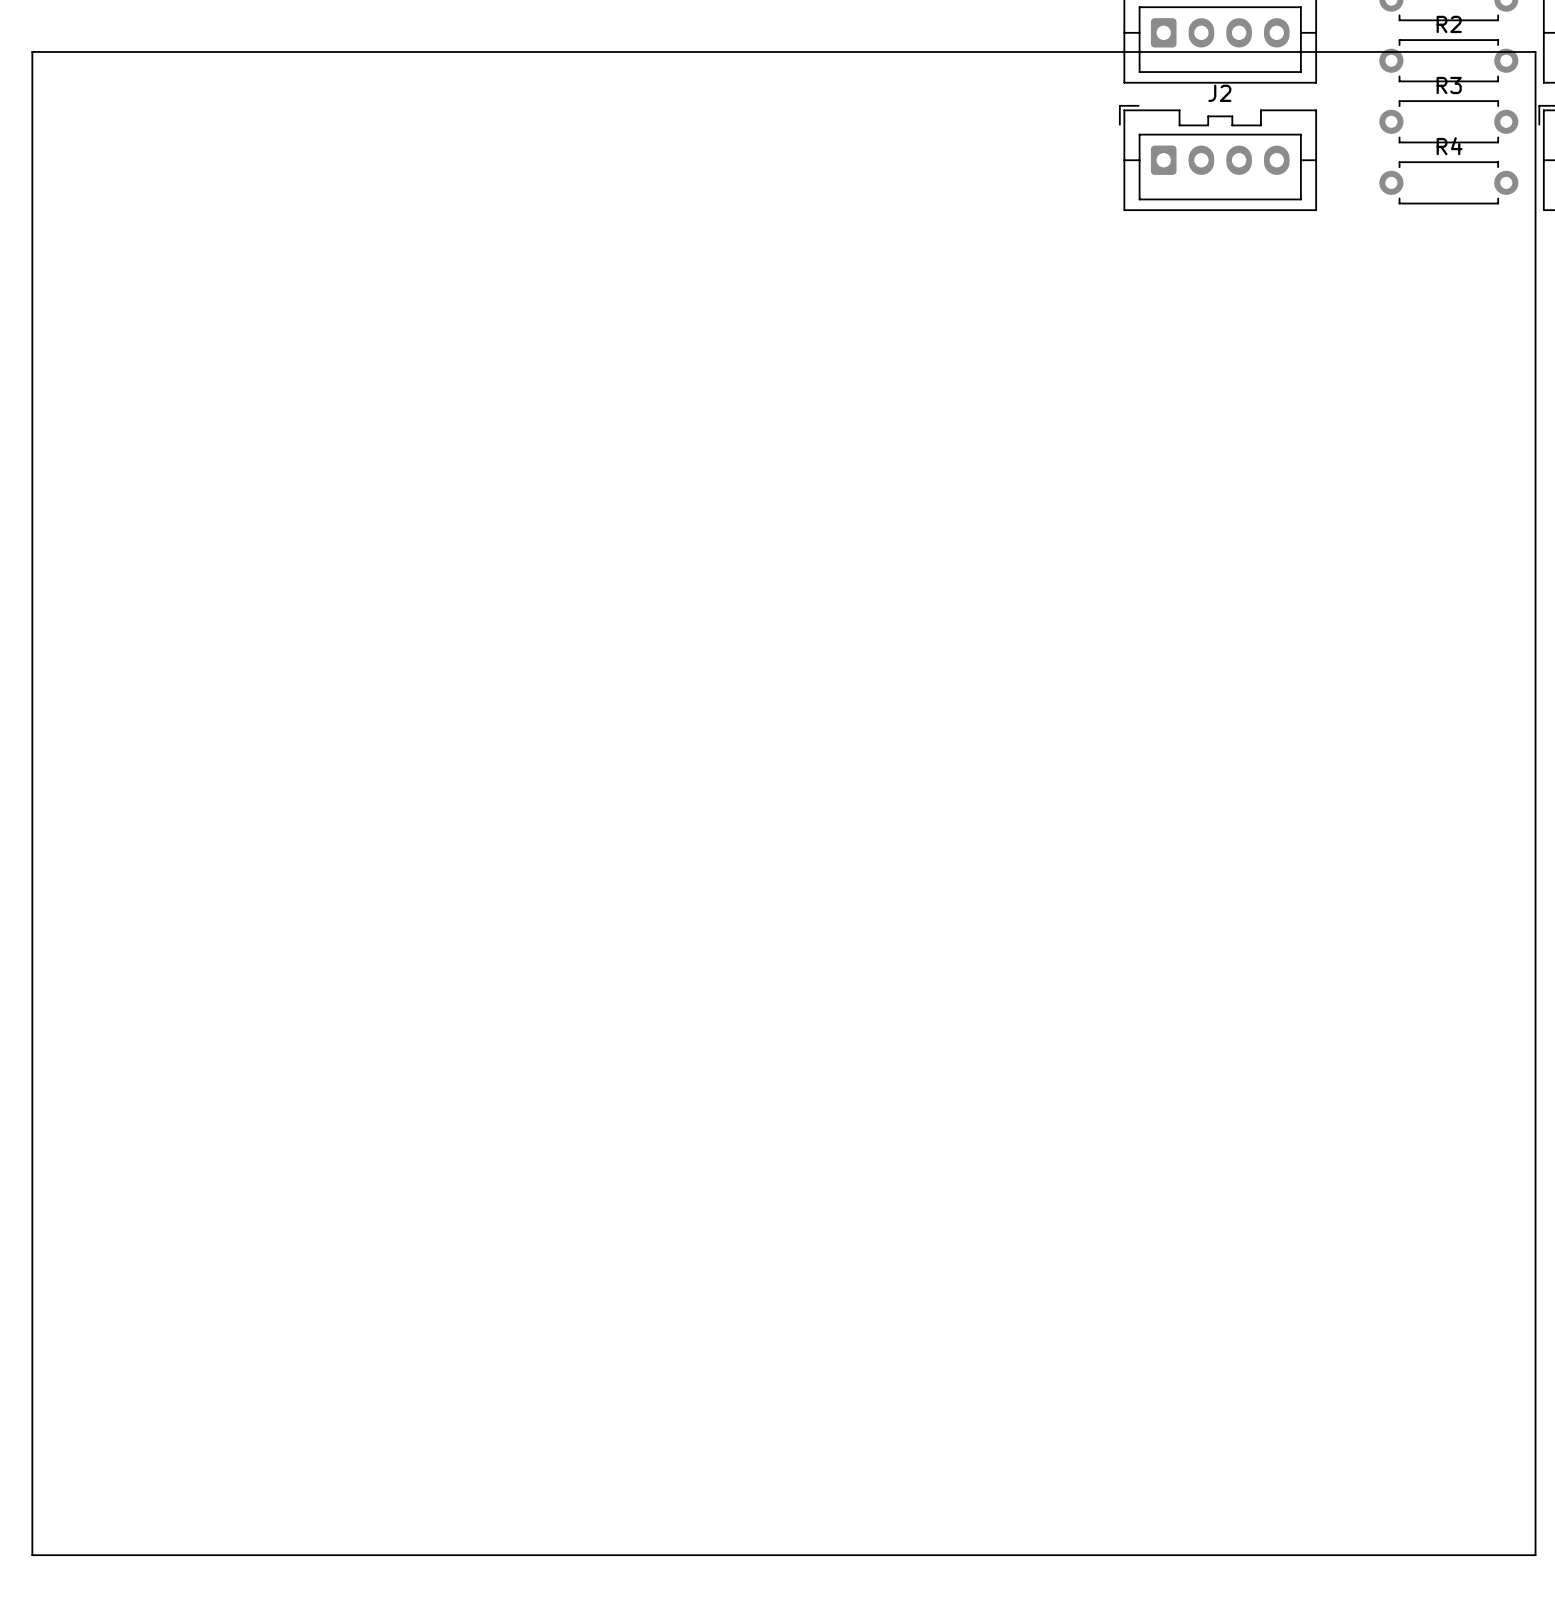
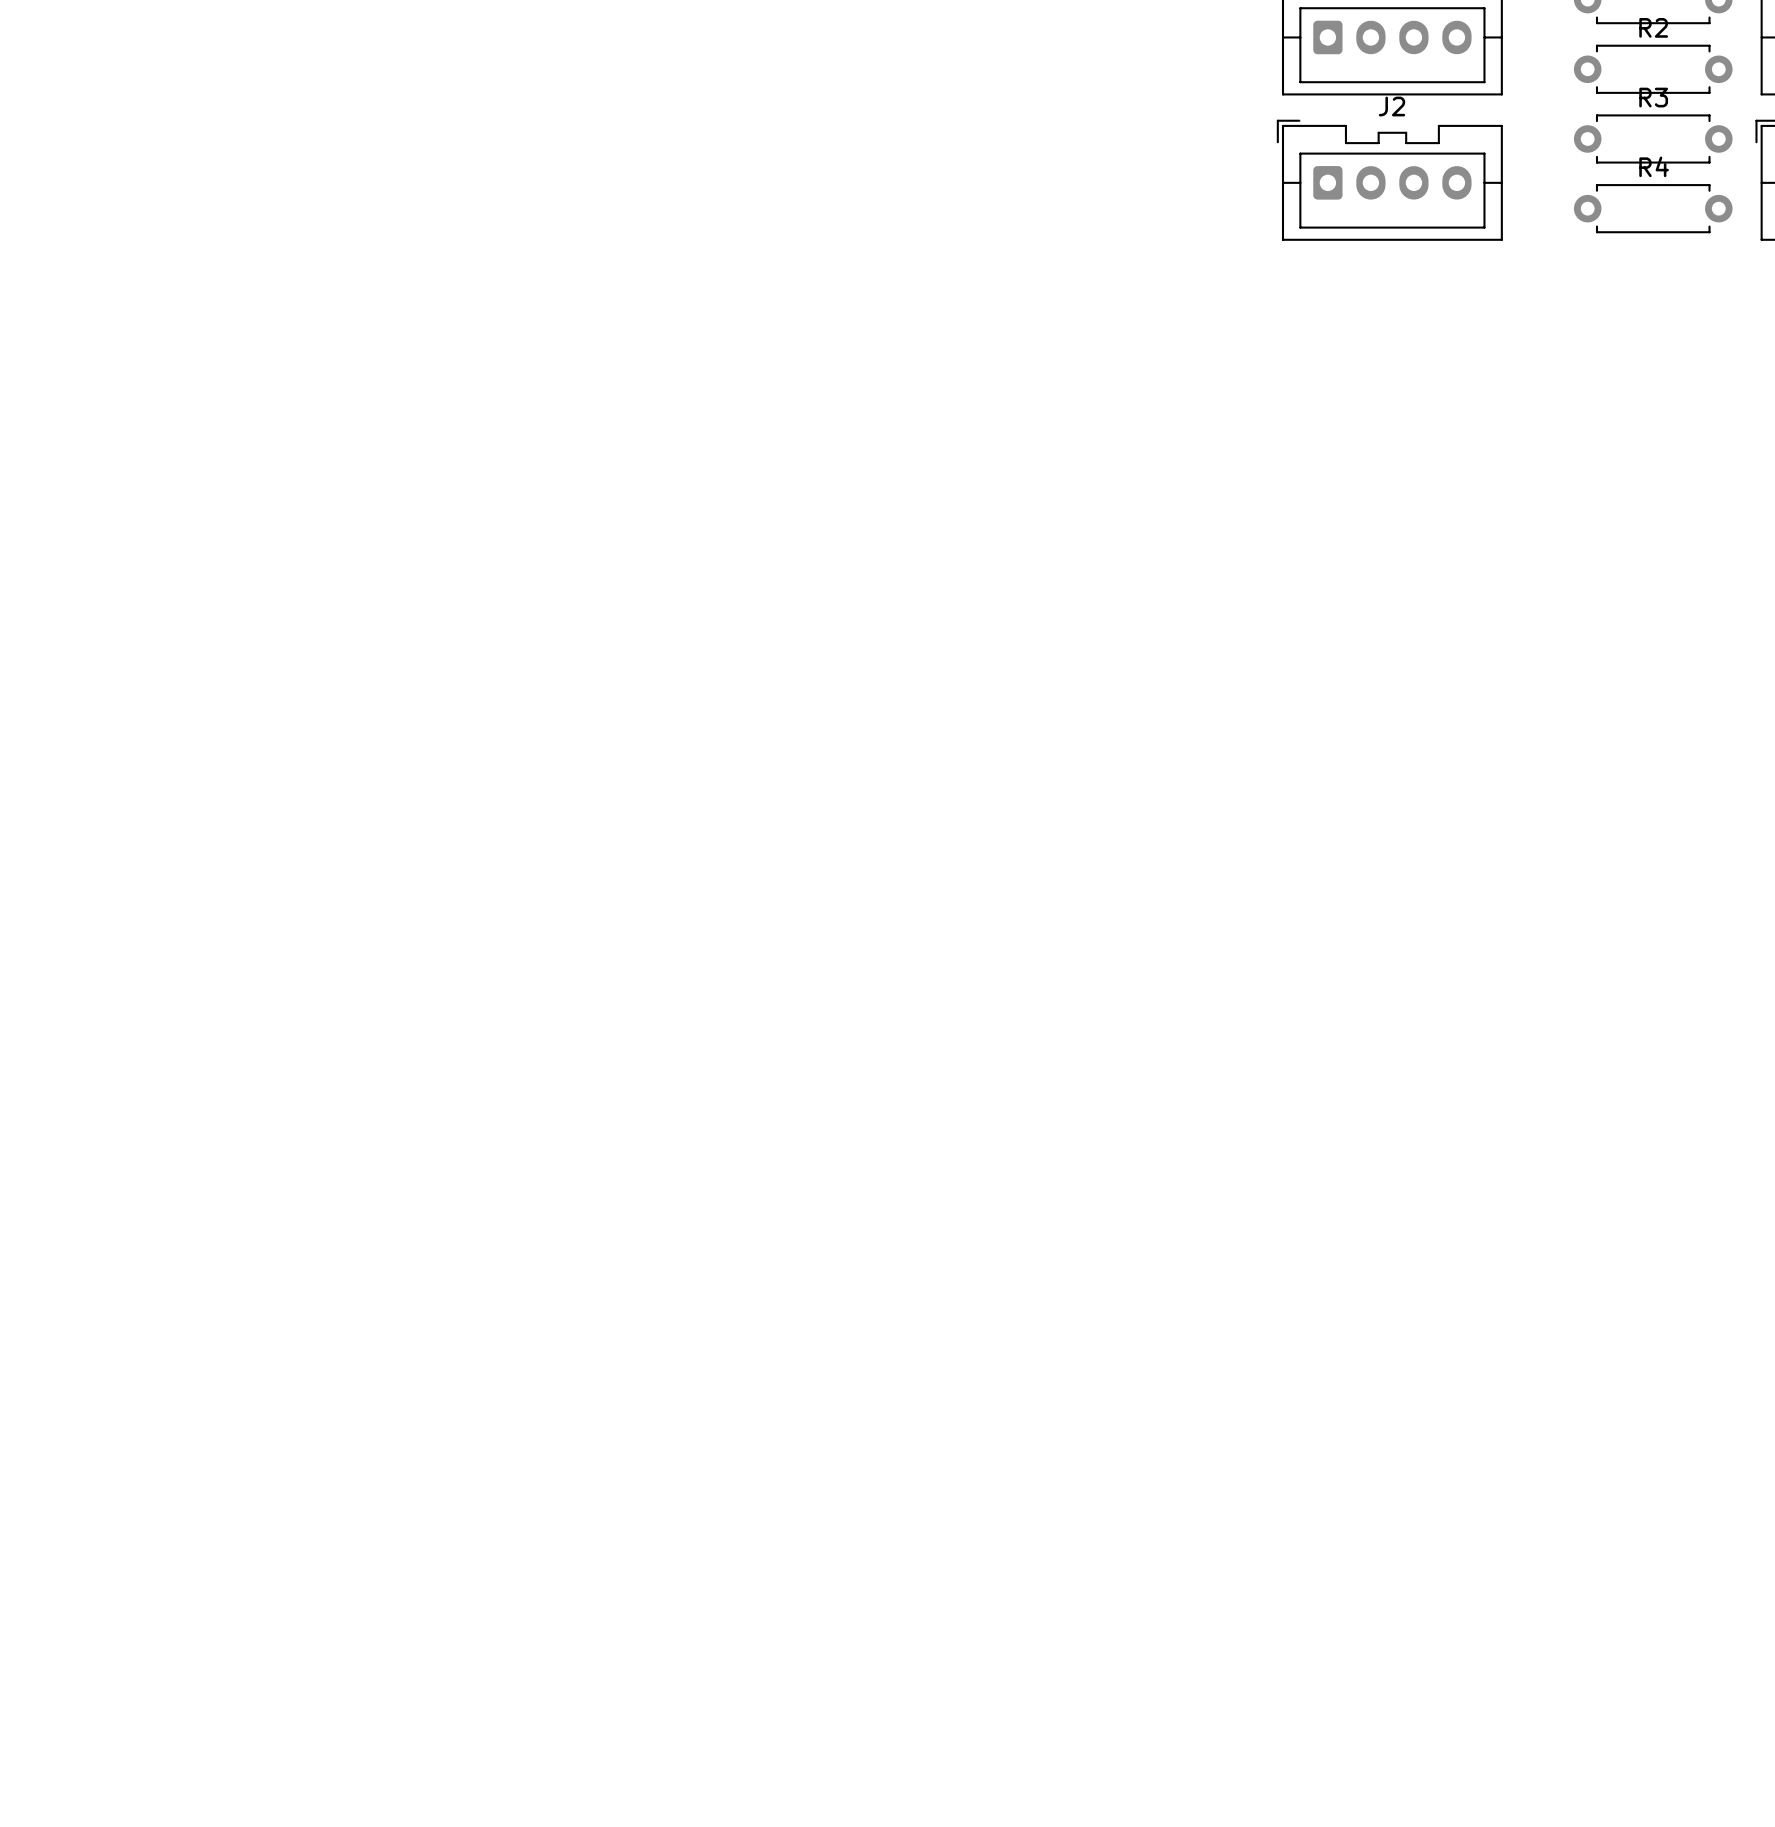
board edge: (32, 51) (1535, 51) (1535, 1555) (32, 1555) (32, 51) -> none

